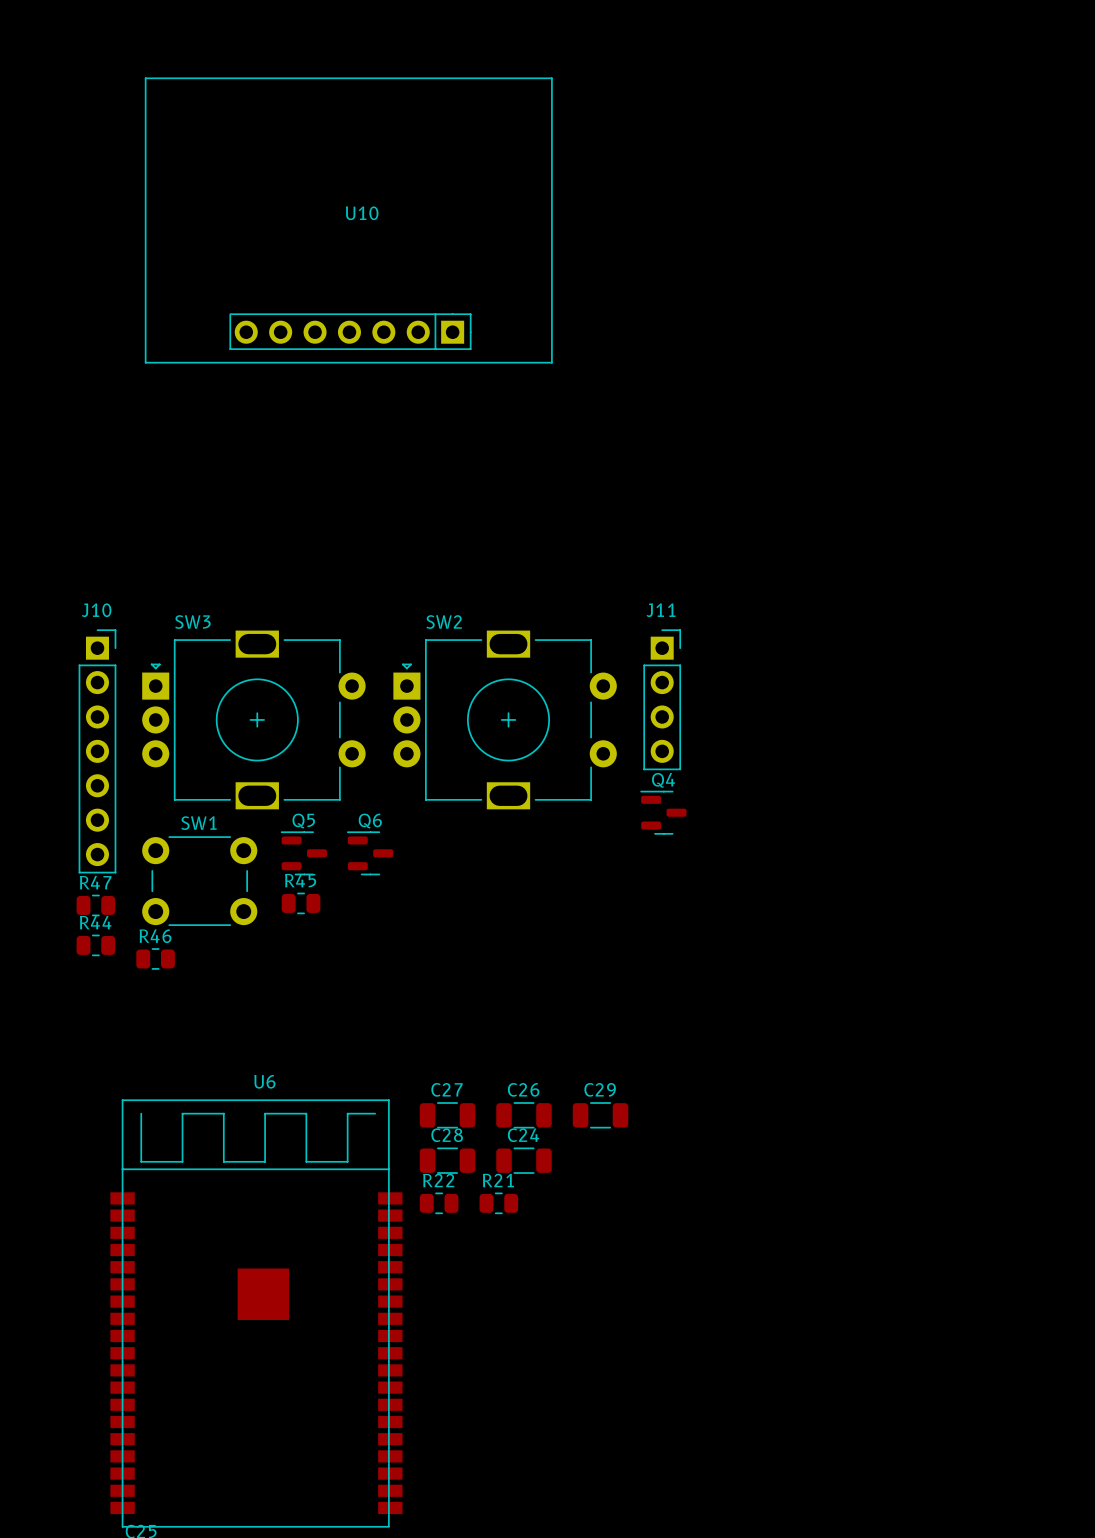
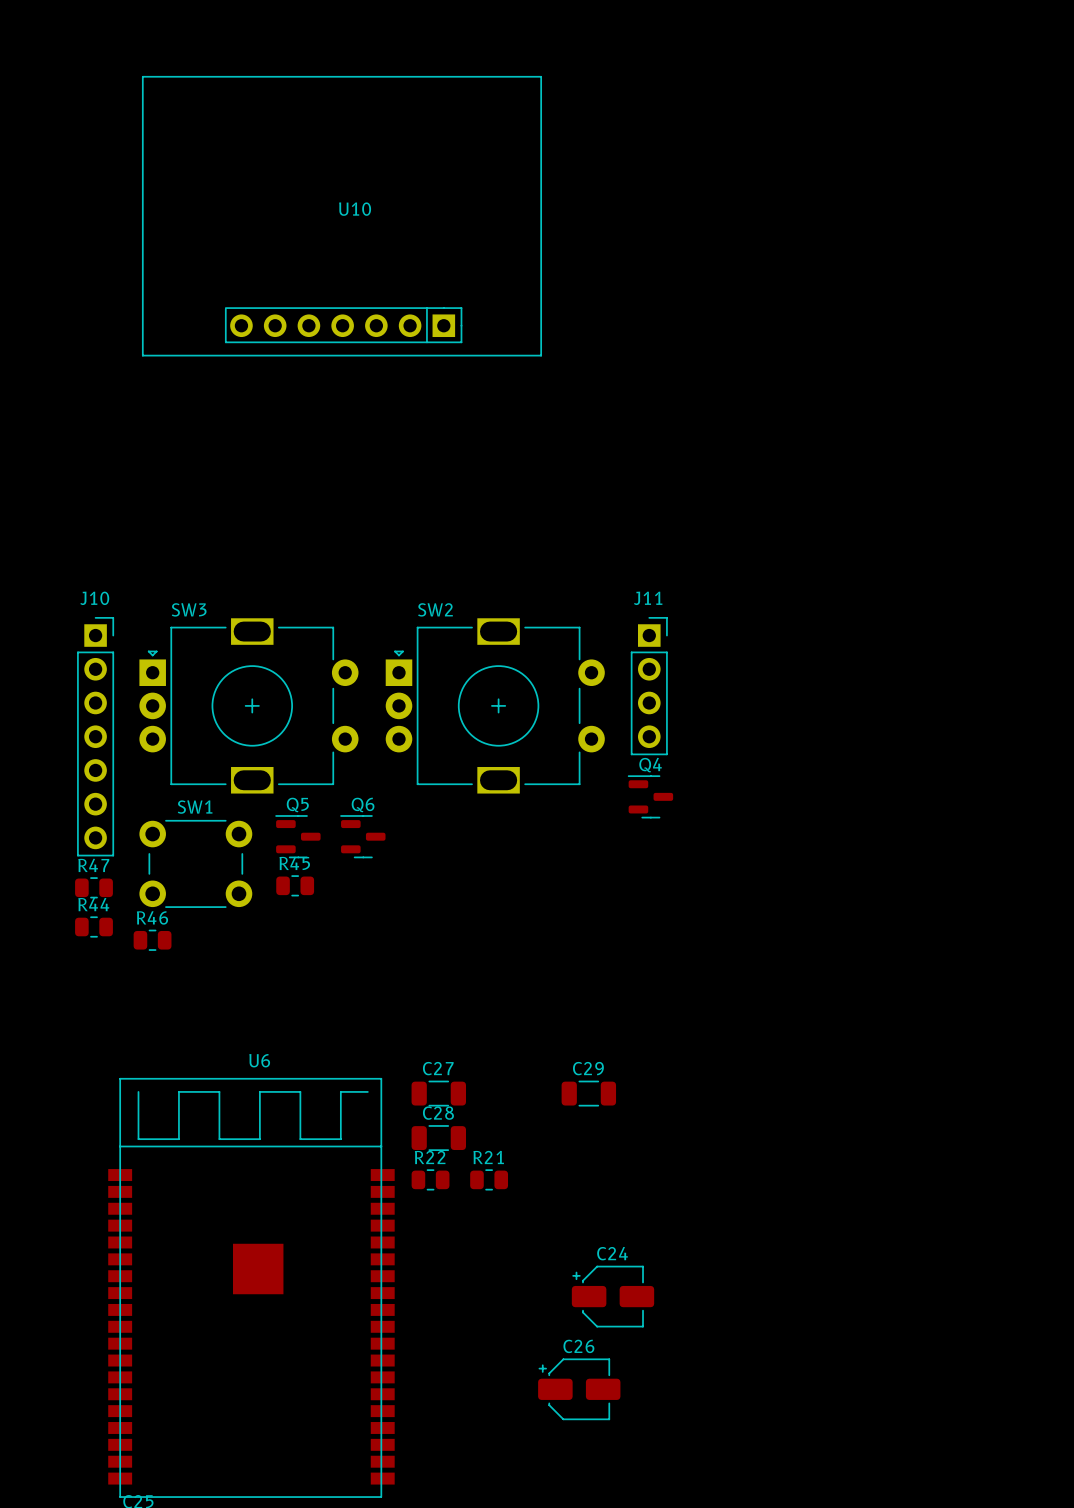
C26 footprint: [496, 1102, 552, 1129] -> [538, 1358, 621, 1421]
C24 footprint: [496, 1147, 552, 1174] -> [571, 1265, 655, 1328]

